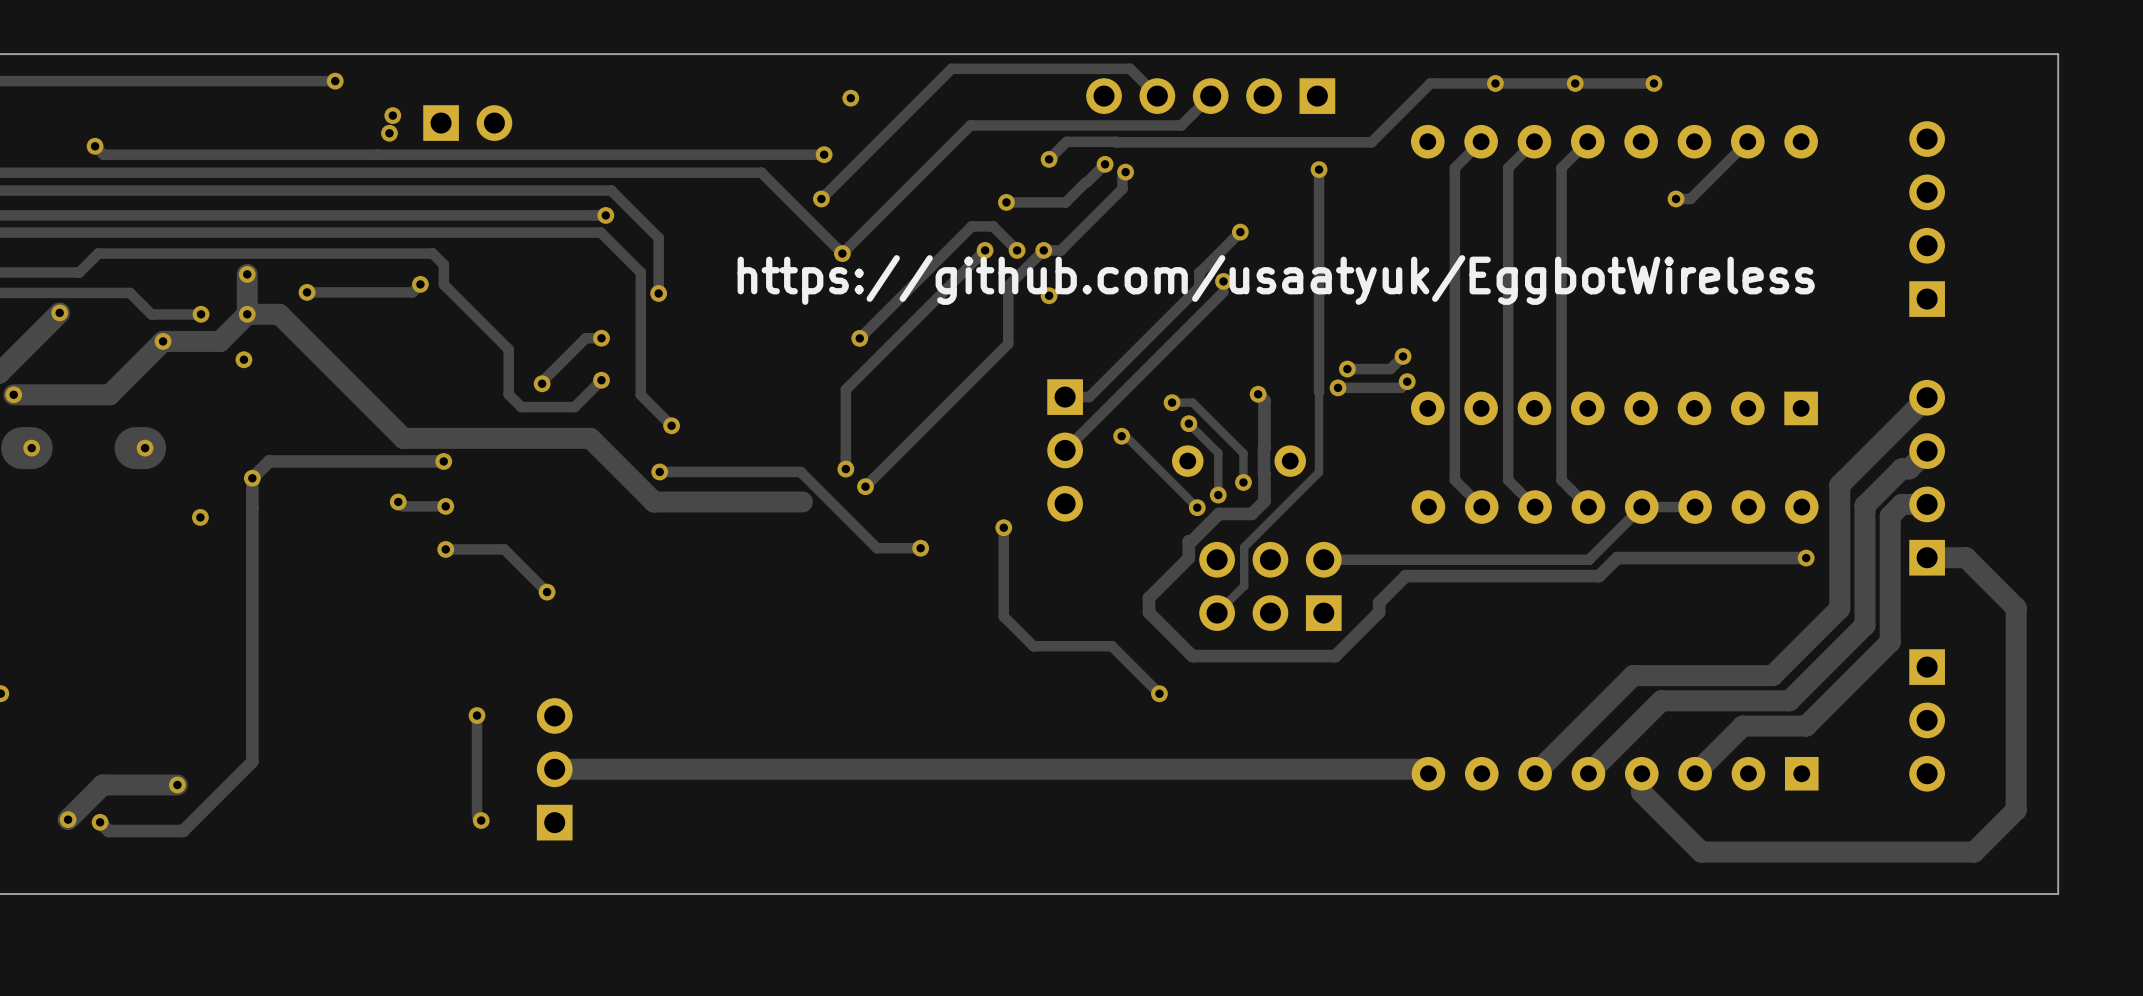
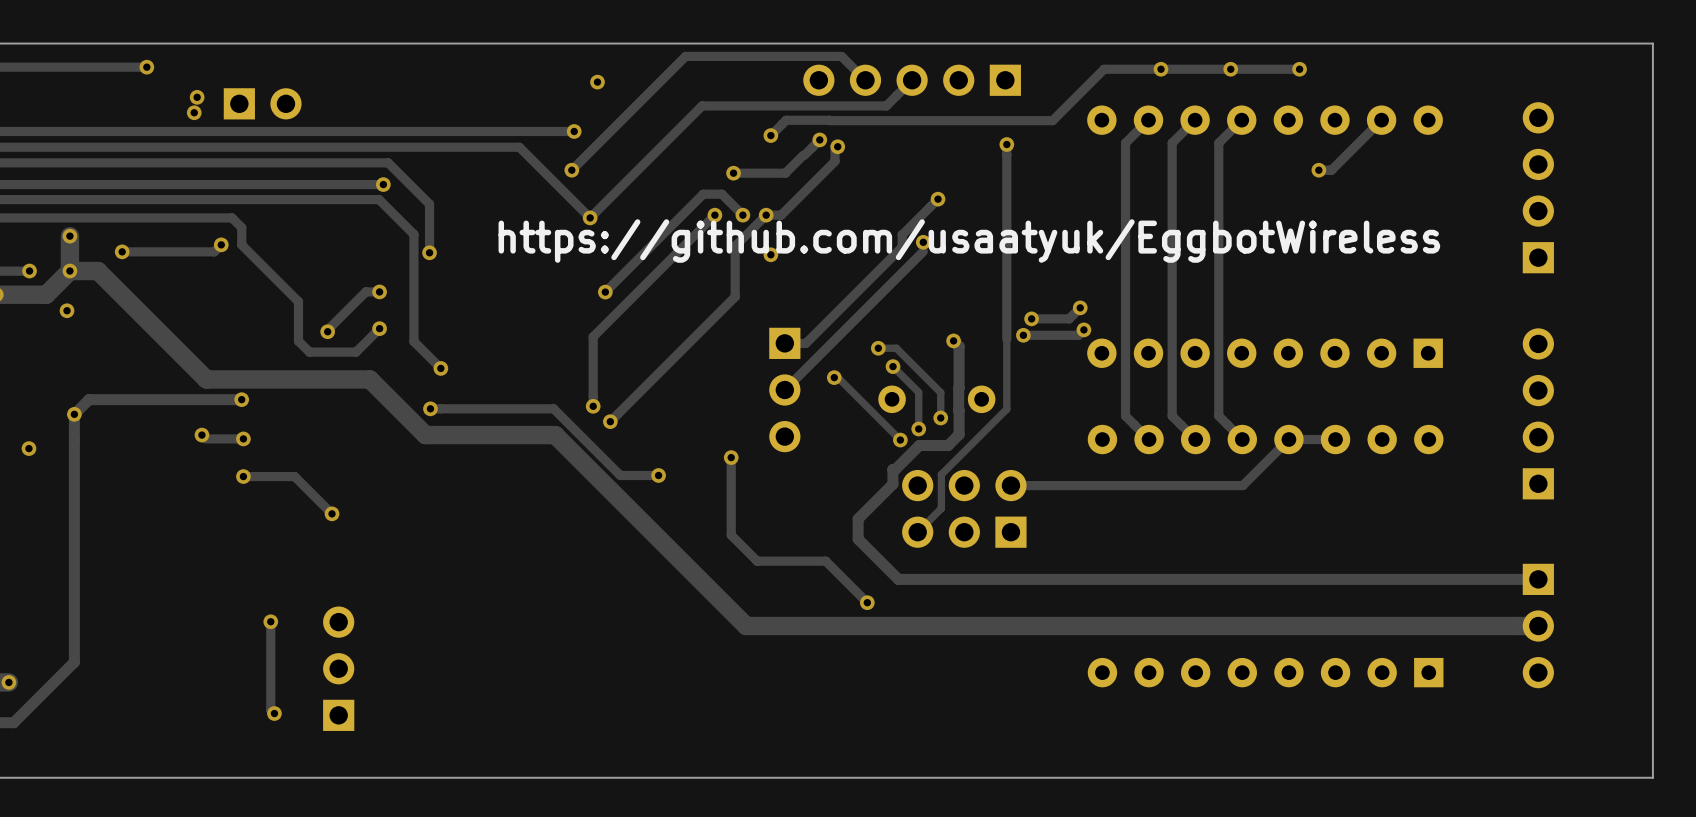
track: (1927, 397) (1839, 485) (1839, 608) (1772, 675) (1633, 675) (1535, 773) -> none
track: (1927, 451) (1909, 468) (1901, 468) (1865, 505) (1865, 625) (1789, 700) (1661, 700) (1588, 773) -> none
track: none -> (555, 435) (746, 626) (1538, 626)
track: (1927, 504) (1901, 504) (1890, 516) (1890, 642) (1806, 726) (1742, 726) (1695, 773) -> none
track: (1927, 557) (1965, 557) (2016, 607) (2016, 810) (1974, 852) (1701, 852) (1641, 792) (1641, 773) -> none
track: (1806, 558) (1617, 558) (1599, 576) (1405, 576) (1379, 602) (1379, 612) (1335, 656) (1192, 656) (1148, 612) -> (1538, 579) (898, 579) (858, 539) (858, 531)
via: (1806, 558) -> none
track: (554, 769) (1423, 769) (1428, 773) -> none

